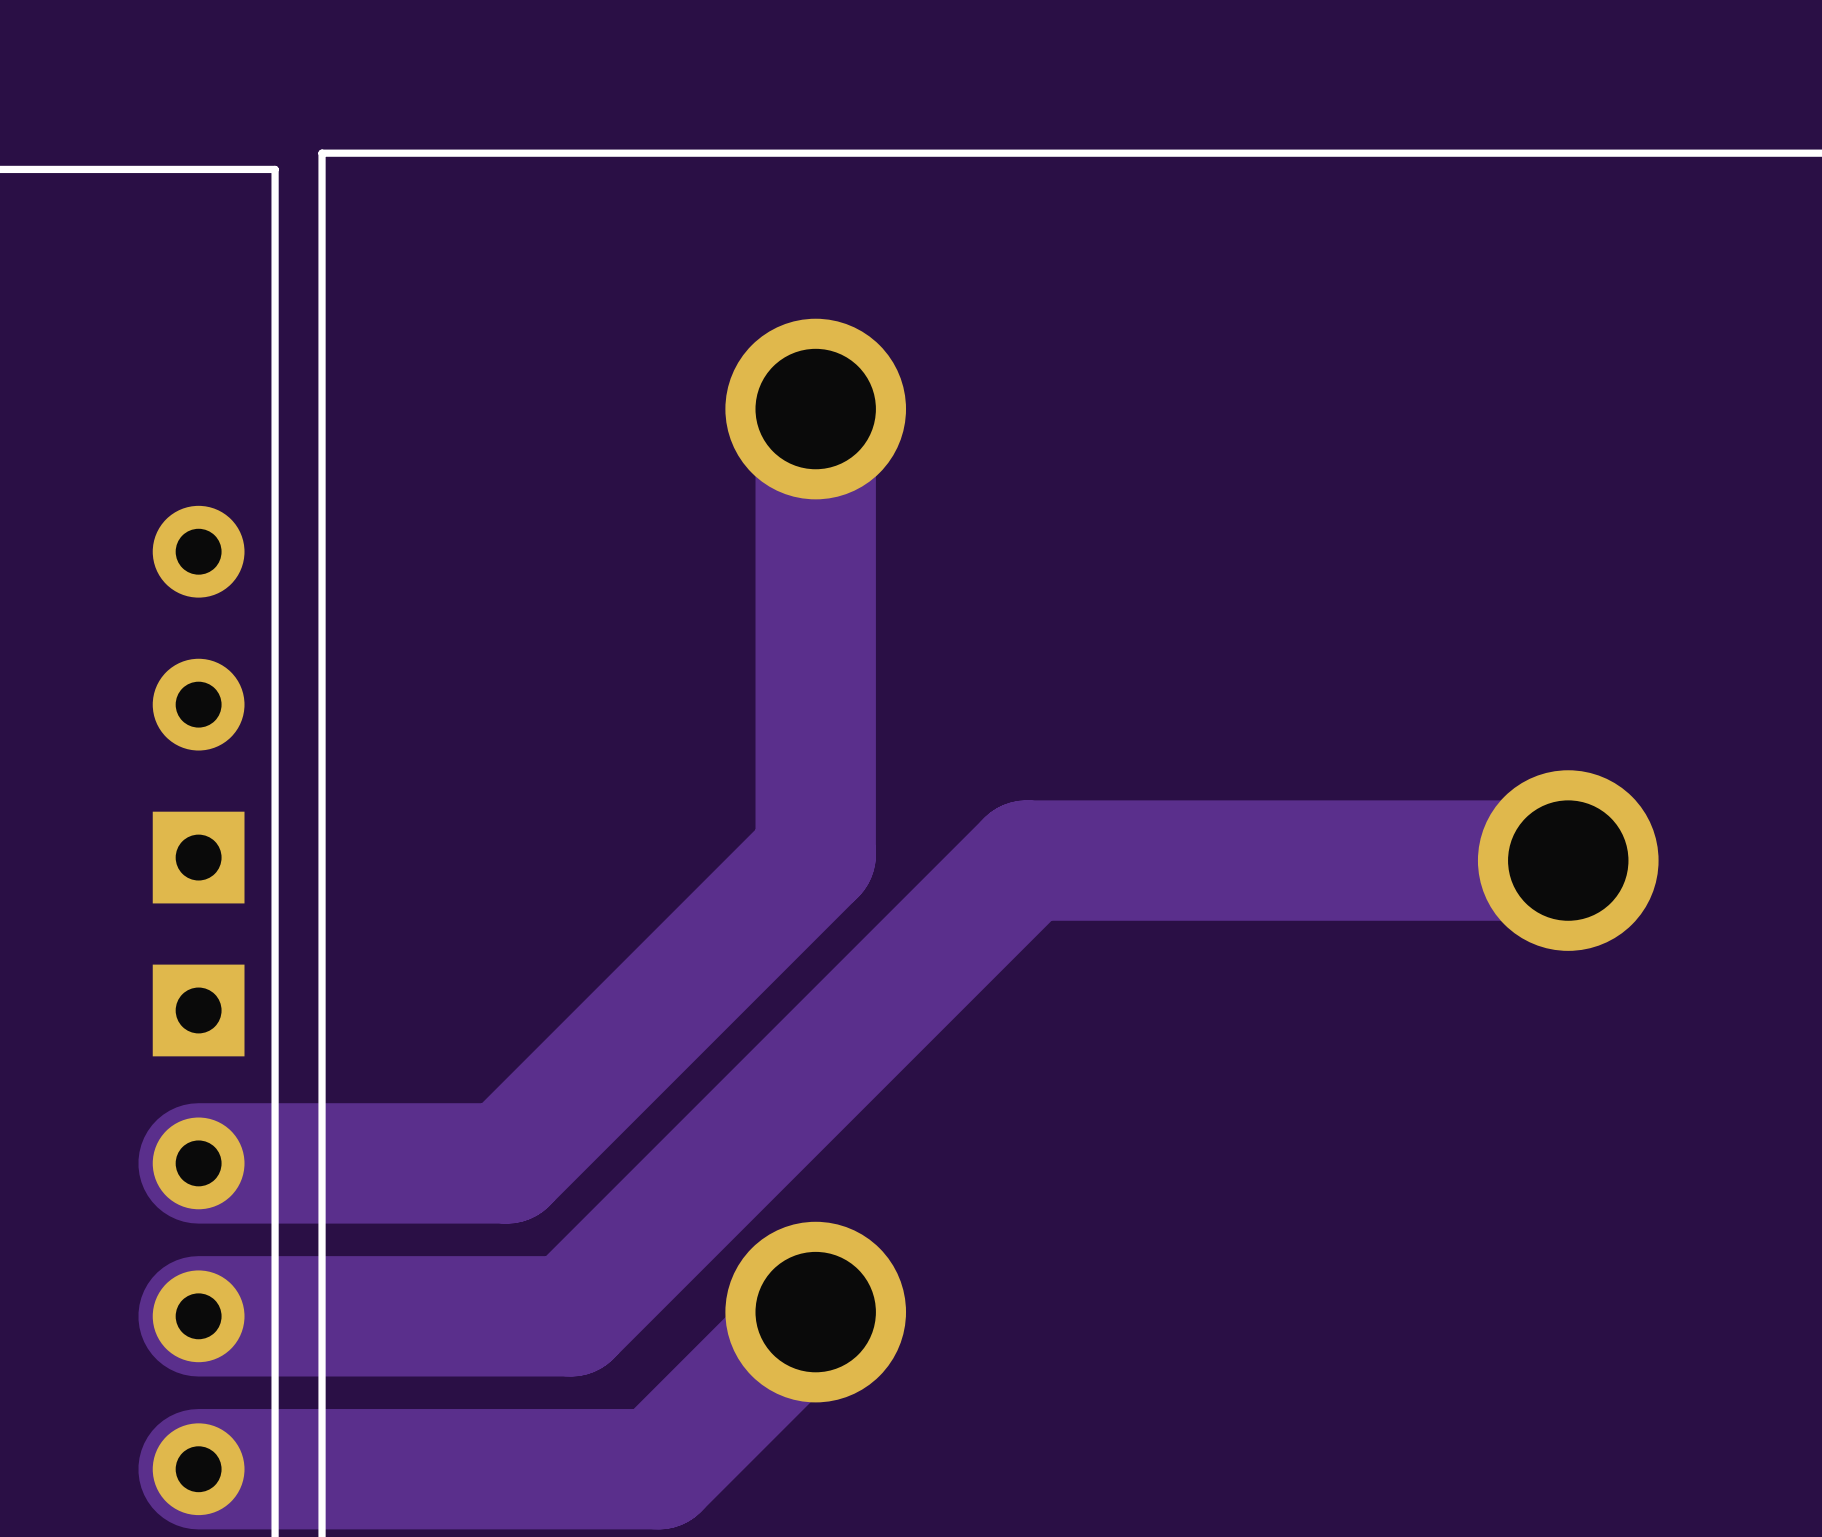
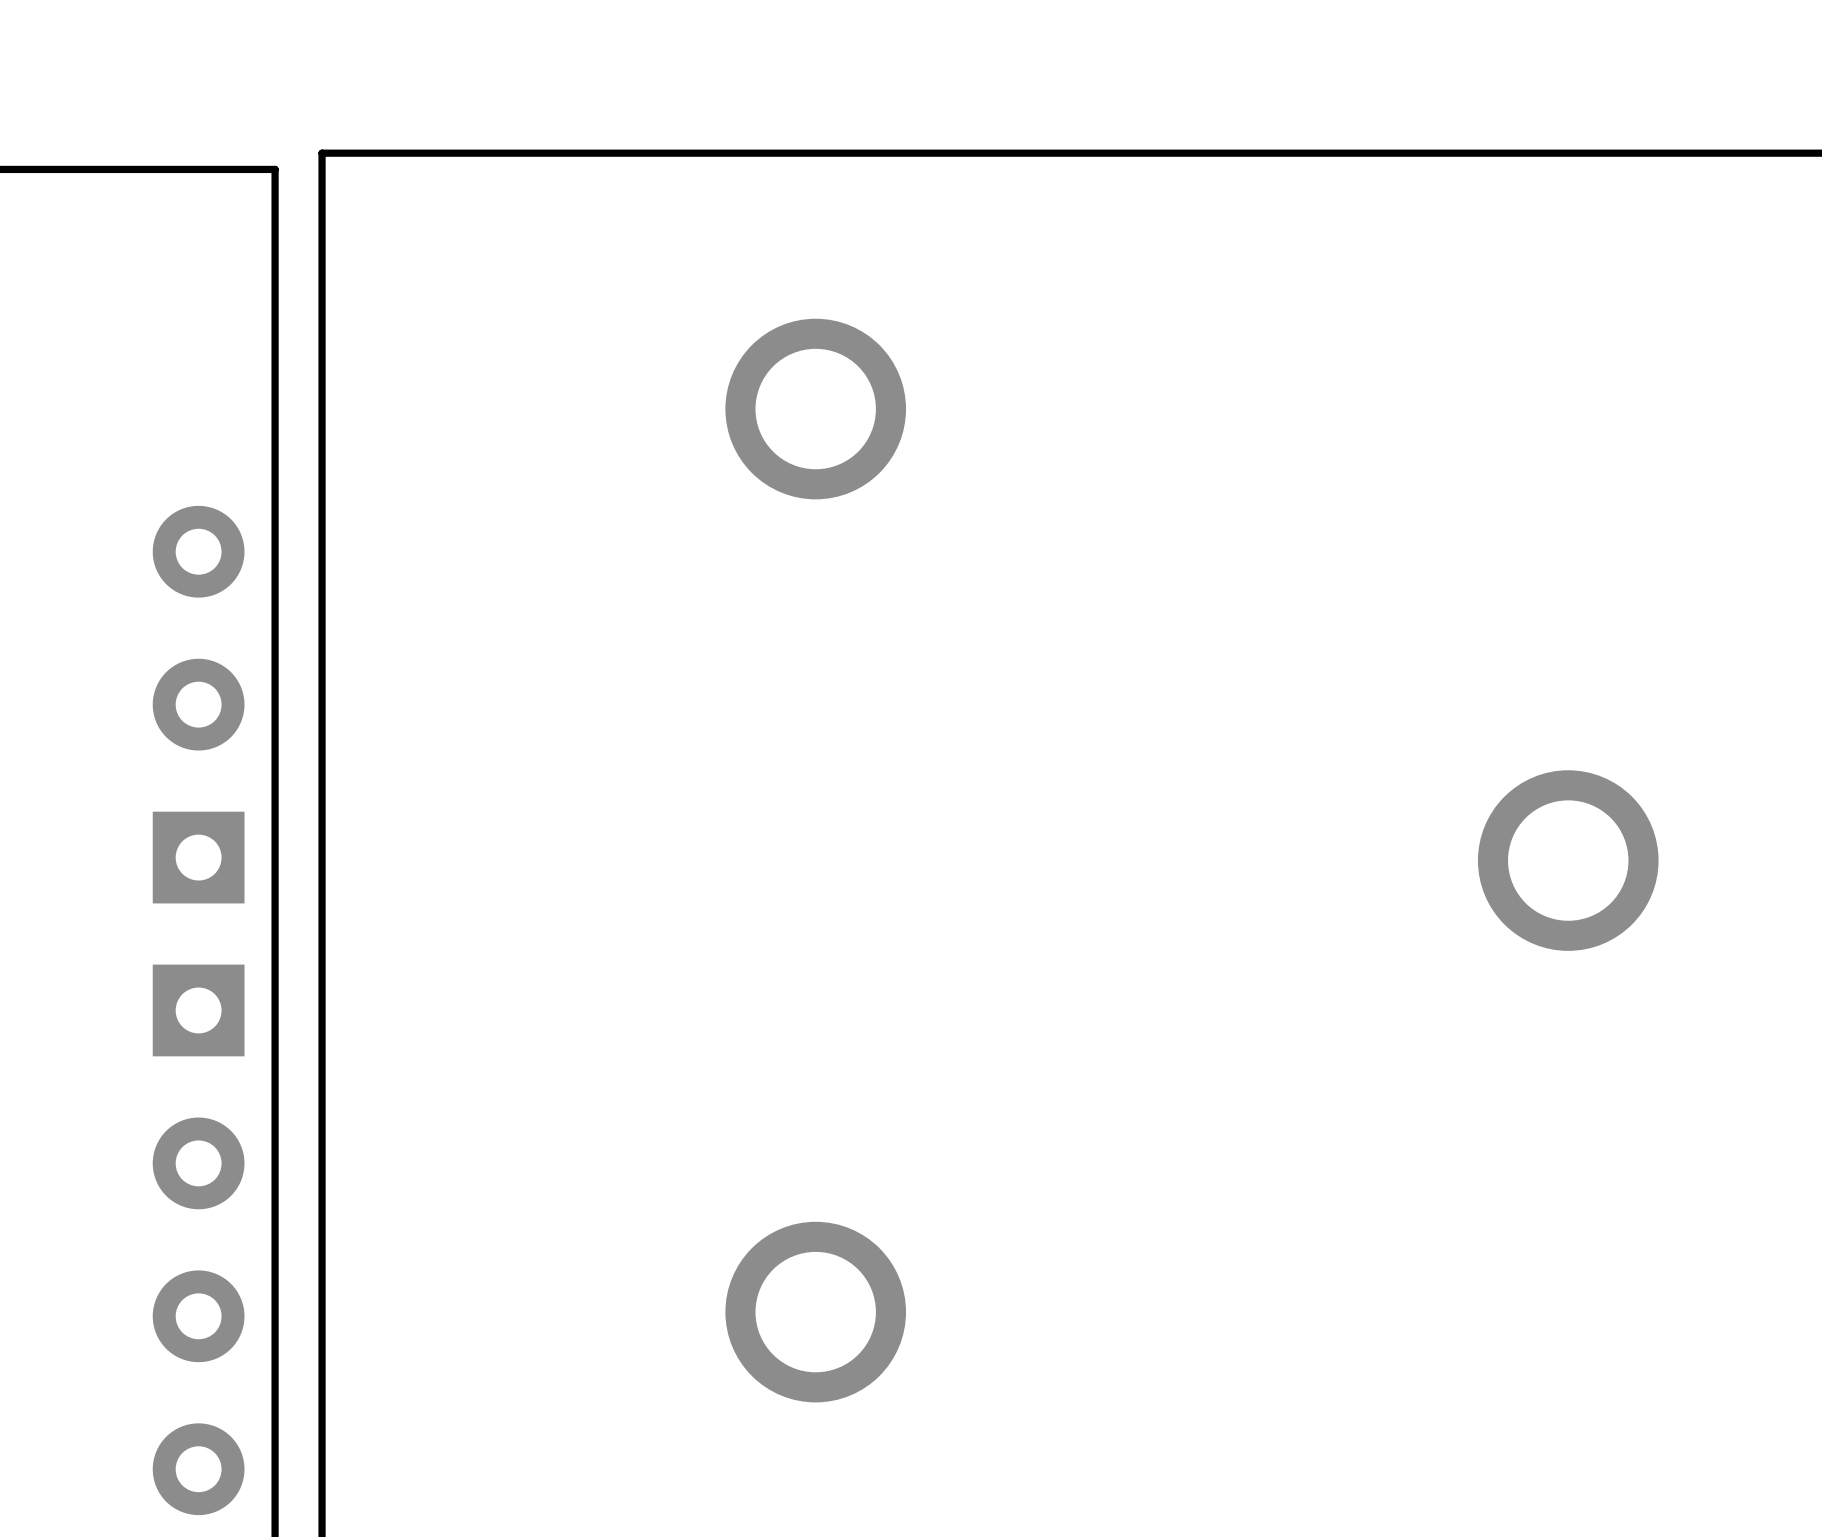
track: (815, 409) (815, 854) (506, 1163) (198, 1163) -> none
track: (1568, 860) (1026, 860) (570, 1316) (198, 1316) -> none
track: (815, 1312) (658, 1469) (198, 1469) -> none

